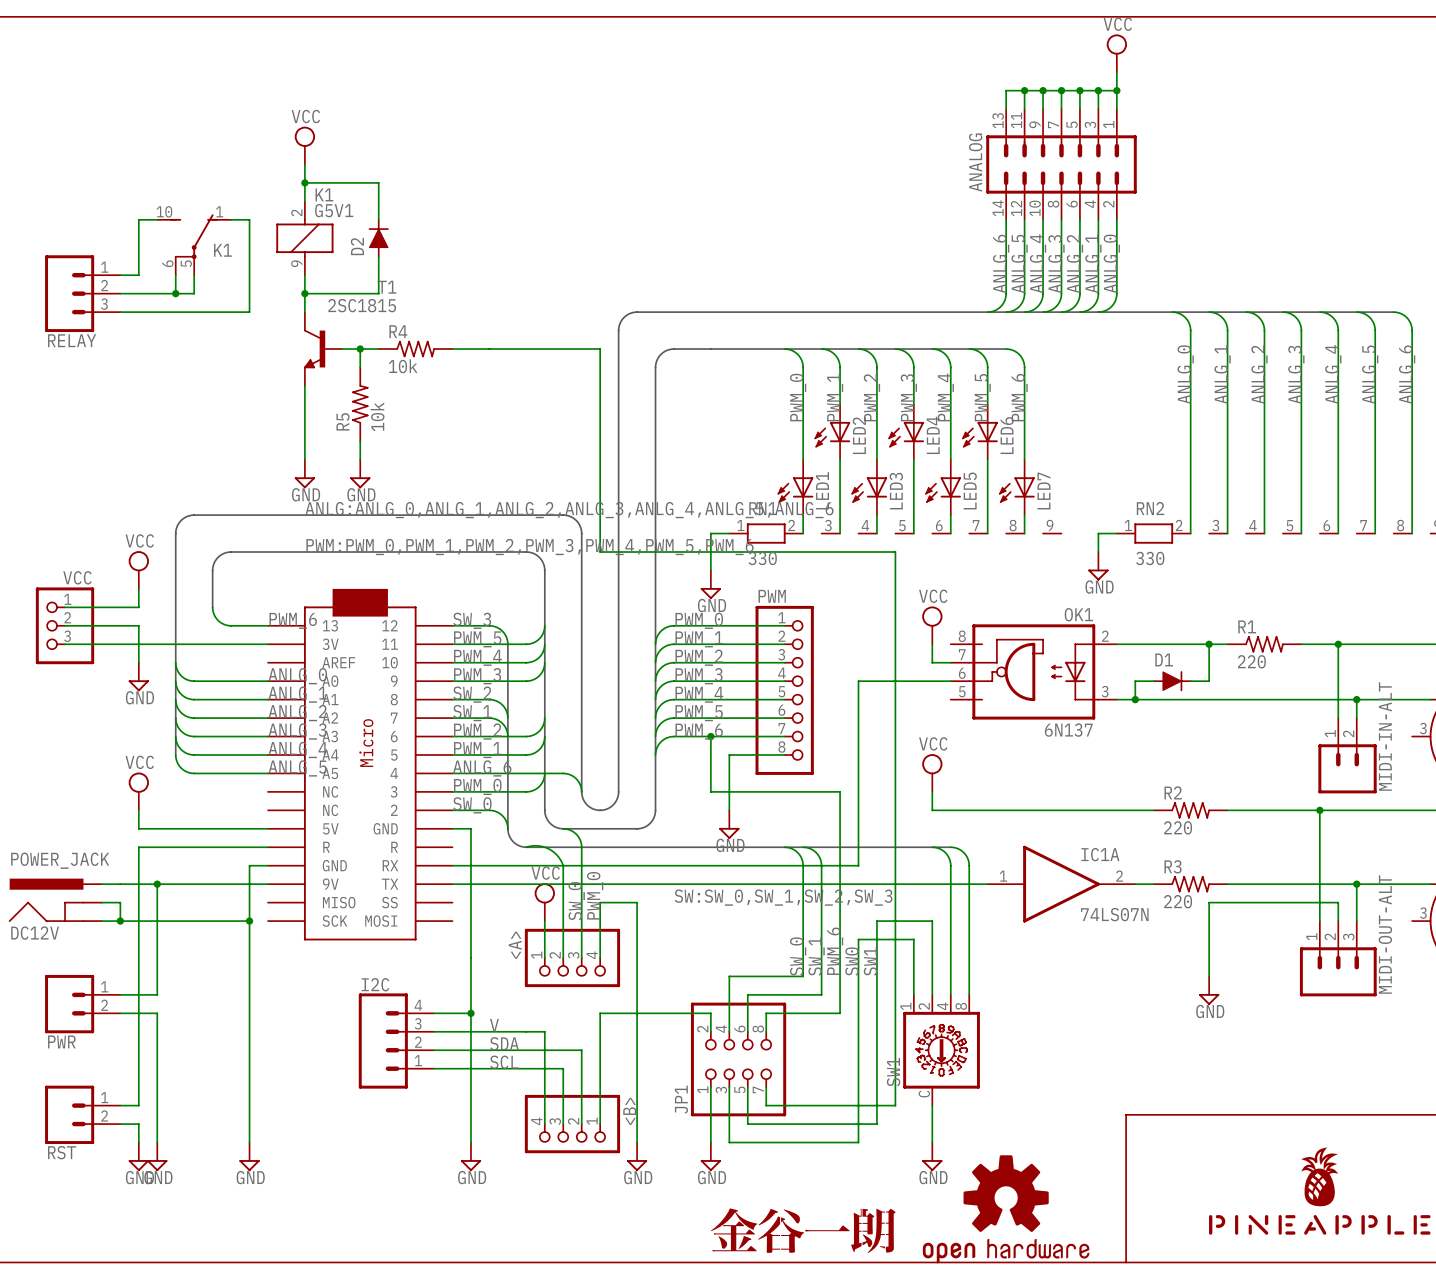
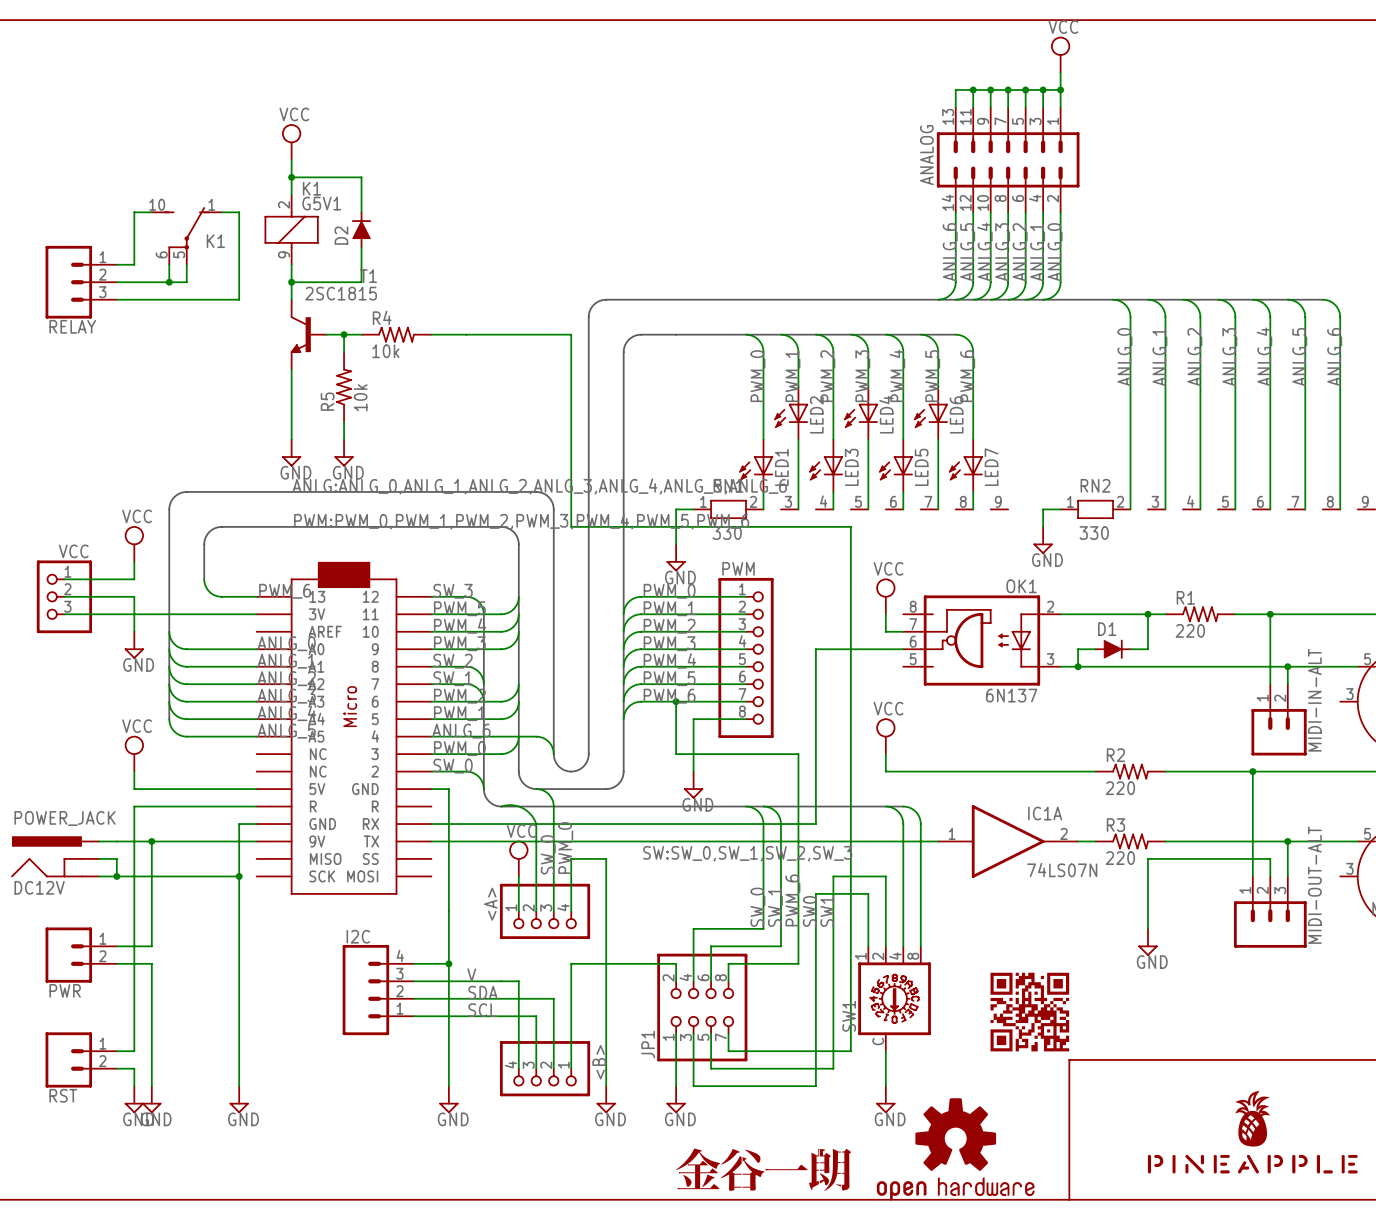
part: none -> (1029, 1012)

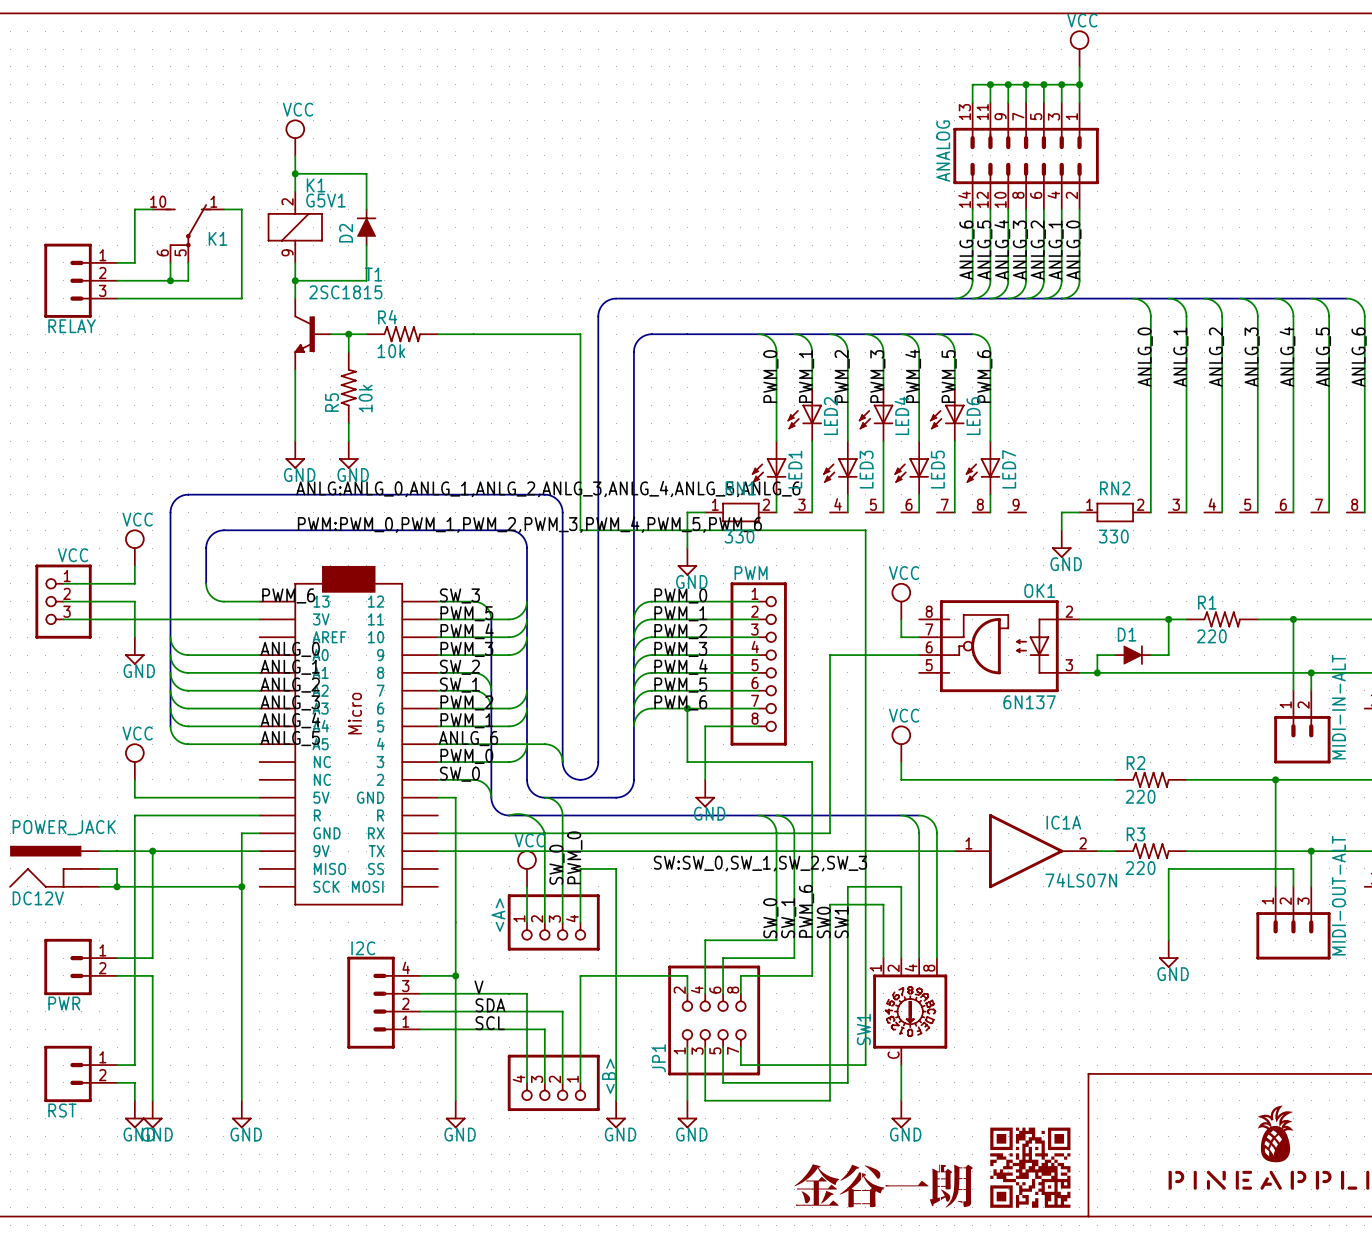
part position: (1029, 1012) -> (1030, 1167)
part: (955, 1149) -> none
part position: (763, 1169) -> (883, 1185)

